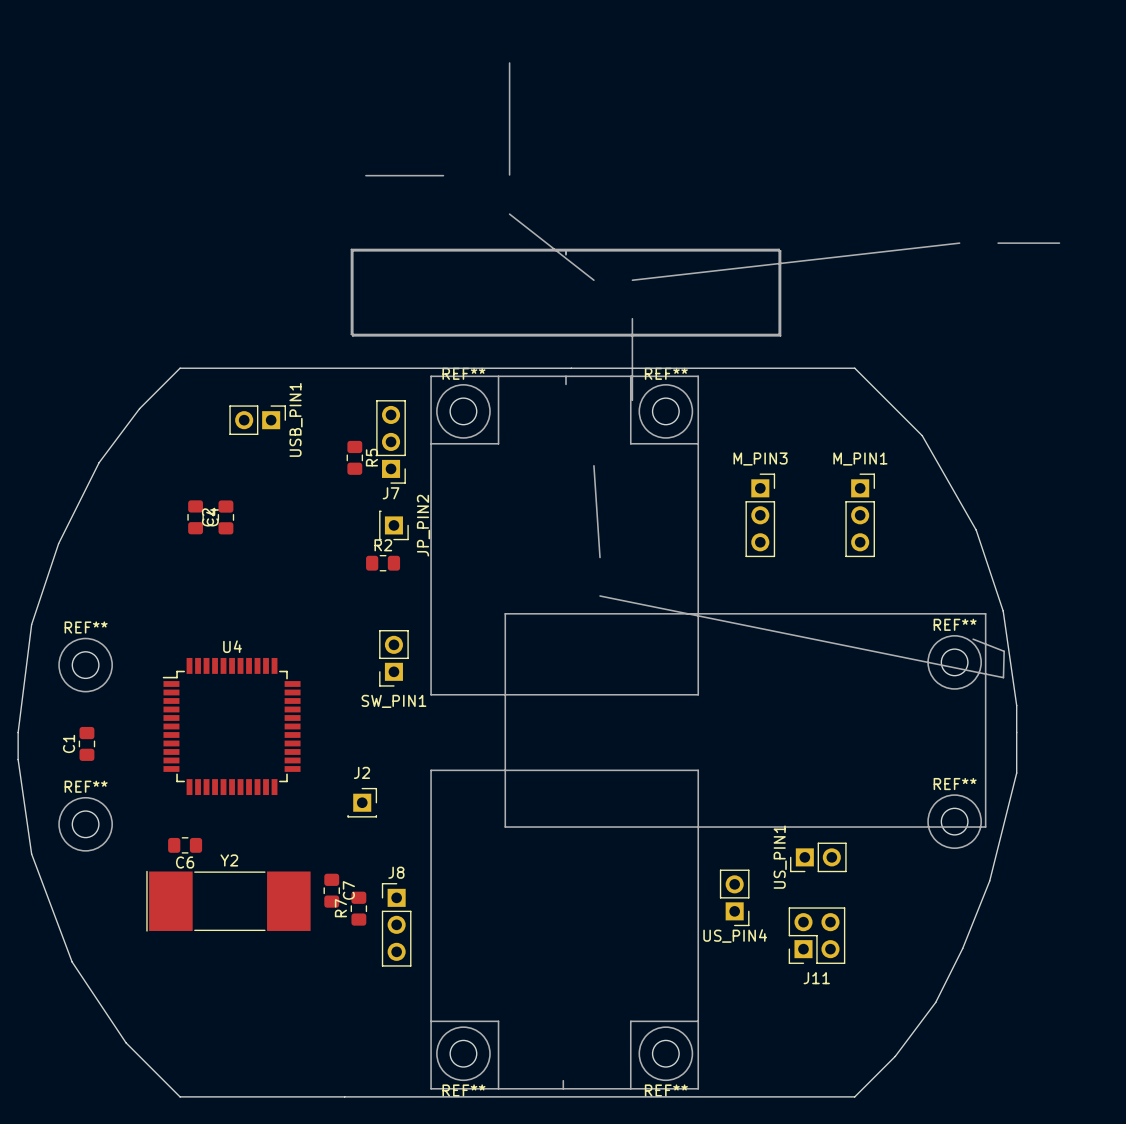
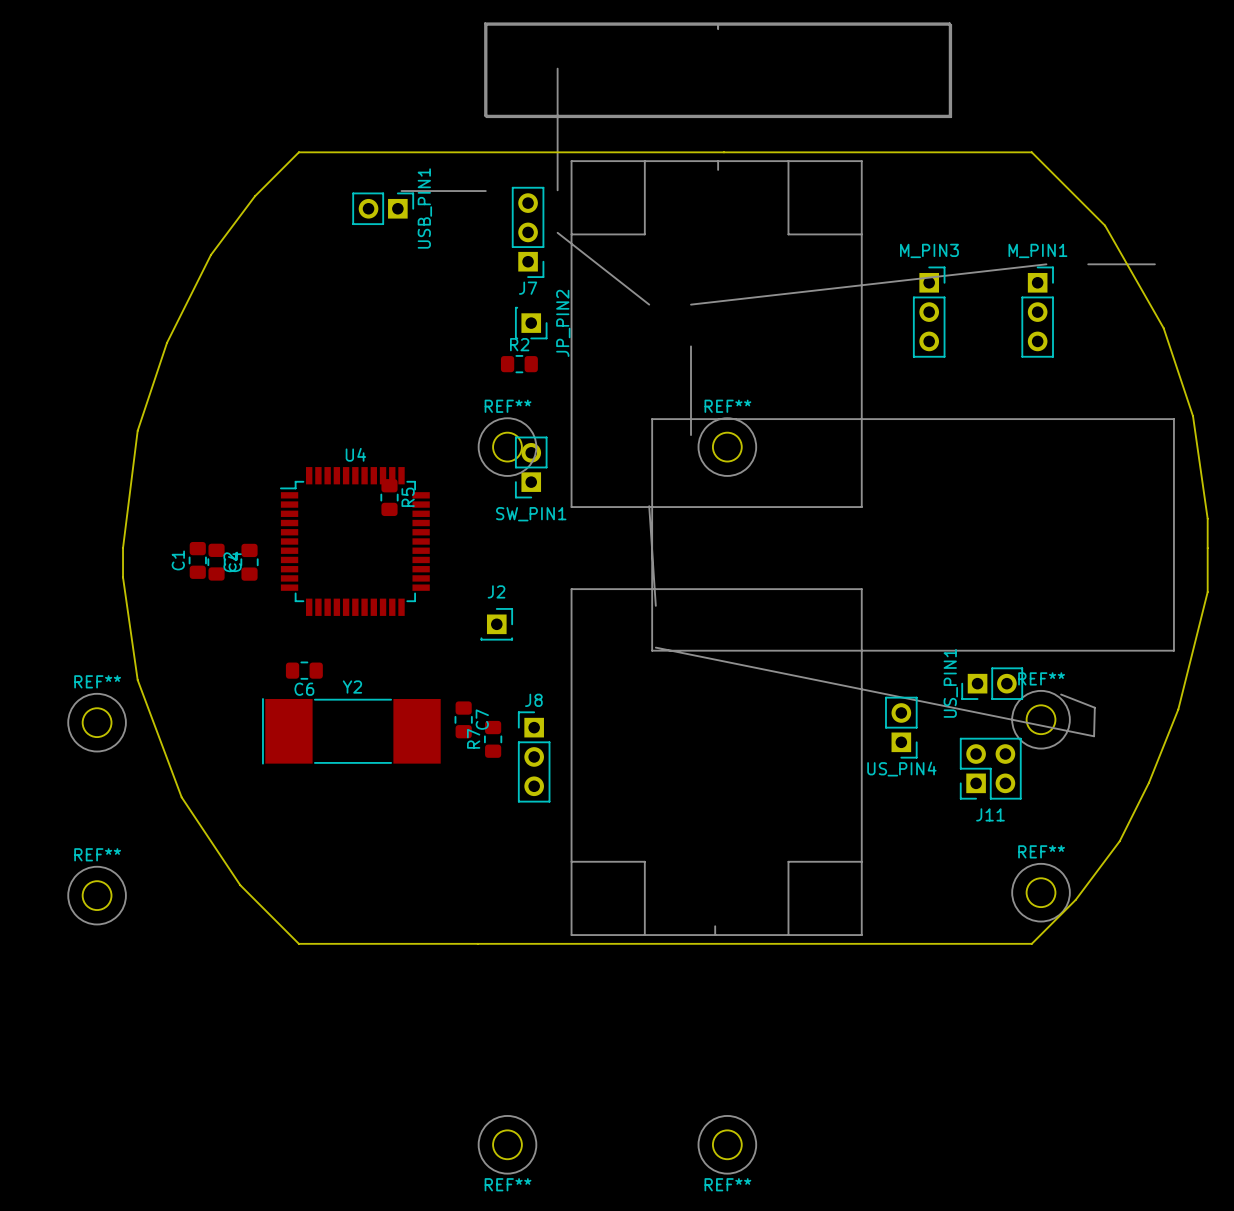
line: (351, 249) (351, 334) (779, 334) (779, 249) (351, 249) -> (485, 23) (485, 115) (949, 115) (949, 23) (485, 23)
line: (352, 250) (780, 250) (780, 335) (352, 335) (352, 250) -> (486, 24) (951, 24) (951, 117) (486, 117) (486, 24)
line: (566, 250) (566, 254) -> (718, 24) (718, 29)
board edge: (180, 368) (139, 408) (99, 462) (58, 543) (31, 624) (18, 732) (18, 759) (31, 854) (72, 961) (126, 1042) (180, 1096) (854, 1096) (895, 1056) (935, 1002) (962, 948) (989, 880) (1016, 773) (1016, 705) (1003, 611) (976, 530) (922, 435) (854, 368) (180, 368) -> (298, 152) (254, 196) (210, 254) (166, 342) (137, 430) (123, 548) (123, 577) (137, 680) (181, 797) (240, 885) (298, 943) (1031, 943) (1075, 899) (1119, 841) (1149, 782) (1178, 709) (1207, 592) (1207, 518) (1193, 416) (1163, 328) (1105, 225) (1031, 152) (298, 152)
line: (431, 376) (431, 694) (698, 694) (698, 376) (431, 376) -> (571, 161) (571, 507) (861, 507) (861, 161) (571, 161)
line: (498, 376) (498, 443) (431, 443) -> (644, 161) (644, 234) (571, 234)
line: (566, 376) (566, 384) -> (718, 161) (718, 169)
line: (630, 376) (630, 443) (698, 443) -> (788, 161) (788, 234) (861, 234)
USB_PIN1 position: (257, 420) -> (383, 208)
J7 position: (391, 441) -> (528, 232)
M_PIN3 position: (760, 515) -> (929, 312)
M_PIN1 position: (860, 515) -> (1037, 312)
JP_PIN2 position: (393, 525) -> (531, 323)
R2 position: (383, 563) -> (519, 364)
line: (505, 613) (985, 613) (985, 827) (505, 827) (505, 613) -> (652, 419) (1173, 419) (1173, 650) (652, 650) (652, 419)
SW_PIN1 position: (393, 658) -> (531, 467)
U4 position: (231, 726) -> (354, 541)
C1 position: (86, 743) -> (197, 560)
line: (431, 770) (431, 1088) (698, 1088) (698, 770) (431, 770) -> (571, 589) (571, 935) (861, 935) (861, 589) (571, 589)
J2 position: (362, 802) -> (496, 624)
C6 position: (185, 845) -> (304, 670)
US_PIN1 position: (818, 857) -> (992, 683)
C7 position: (331, 890) -> (463, 719)
US_PIN4 position: (734, 897) -> (901, 727)
Y2 position: (228, 901) -> (351, 731)
R7 position: (358, 908) -> (493, 739)
J8 position: (396, 924) -> (534, 756)
J11 position: (816, 935) -> (990, 768)
line: (431, 1021) (498, 1021) (498, 1088) -> (571, 861) (644, 861) (644, 935)
line: (698, 1021) (630, 1021) (630, 1088) -> (861, 861) (788, 861) (788, 935)
line: (563, 1080) (563, 1088) -> (715, 926) (715, 935)

